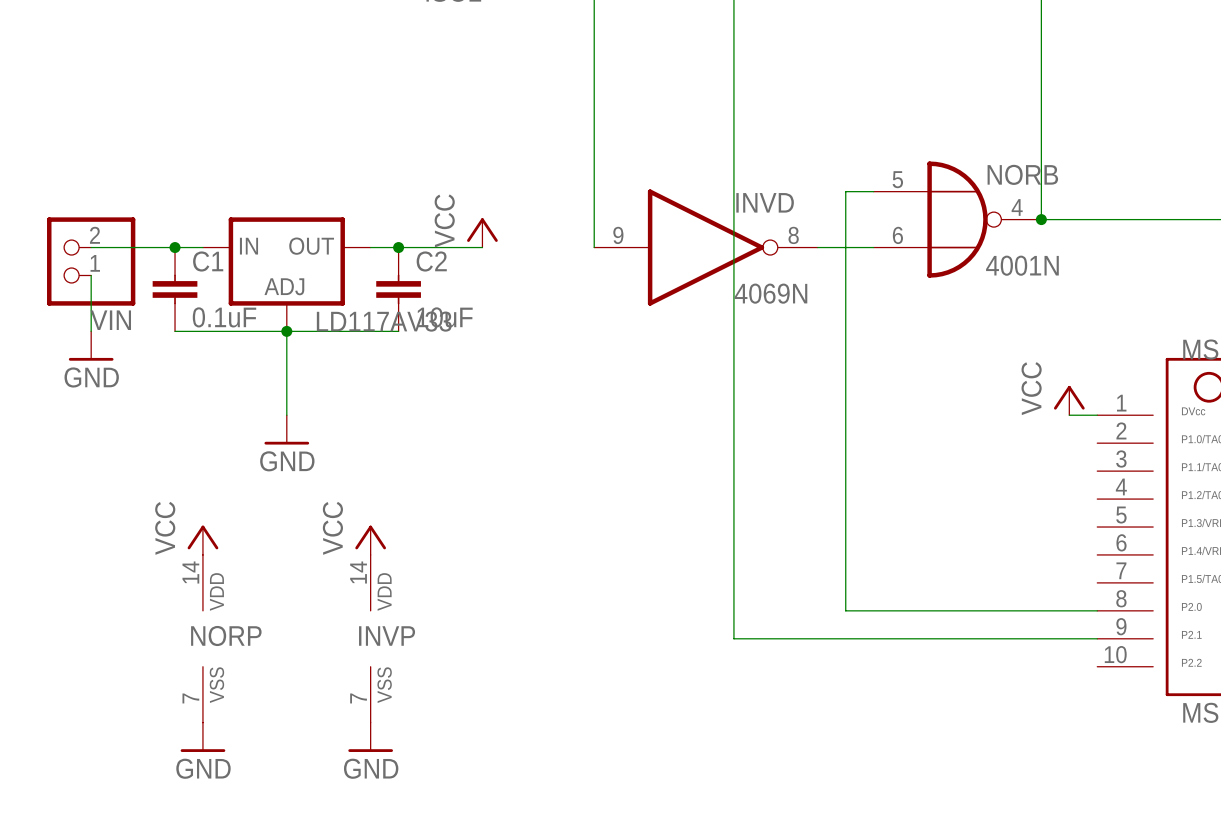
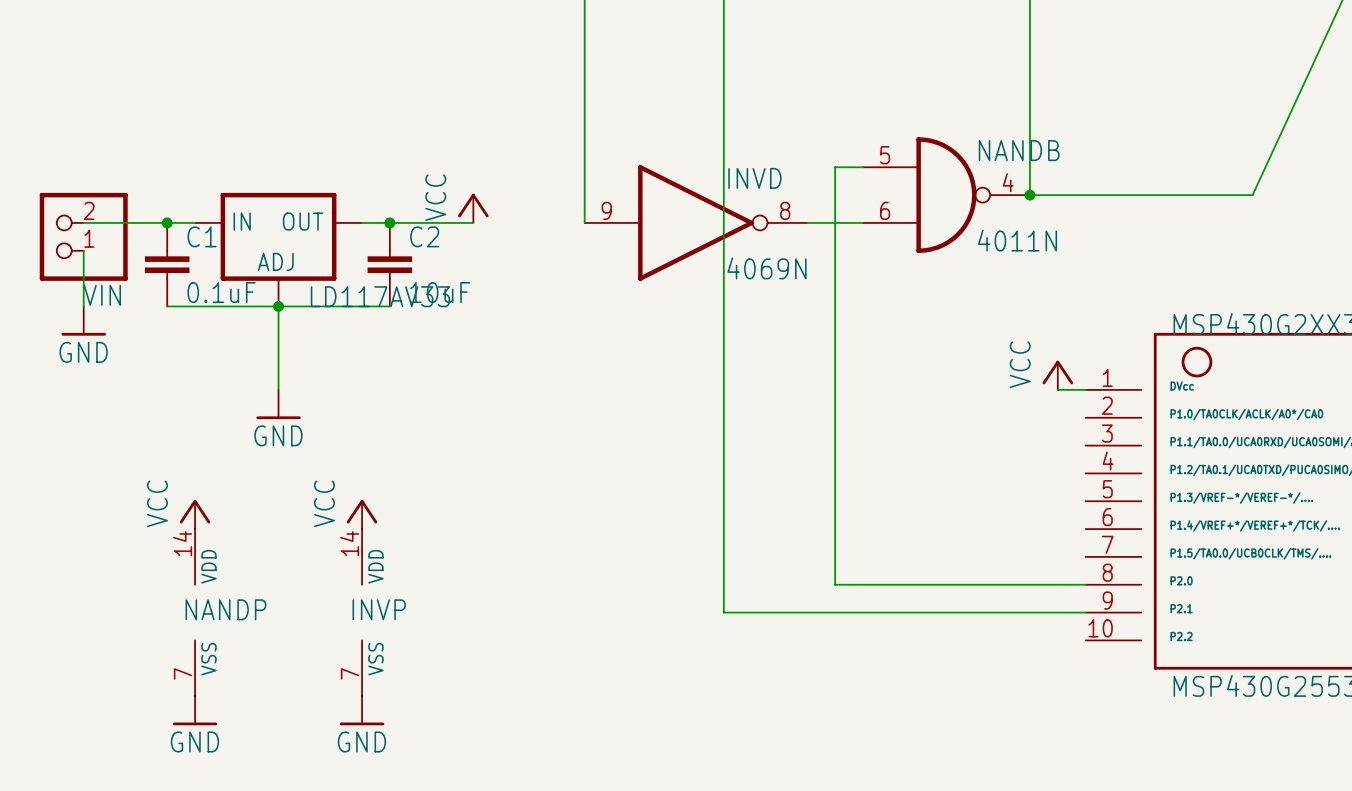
NORB: 4001N (957, 219) -> none
NANDB: none -> 4011N (946, 195)
NORP name: NORP (226, 636) -> NANDP (225, 609)

